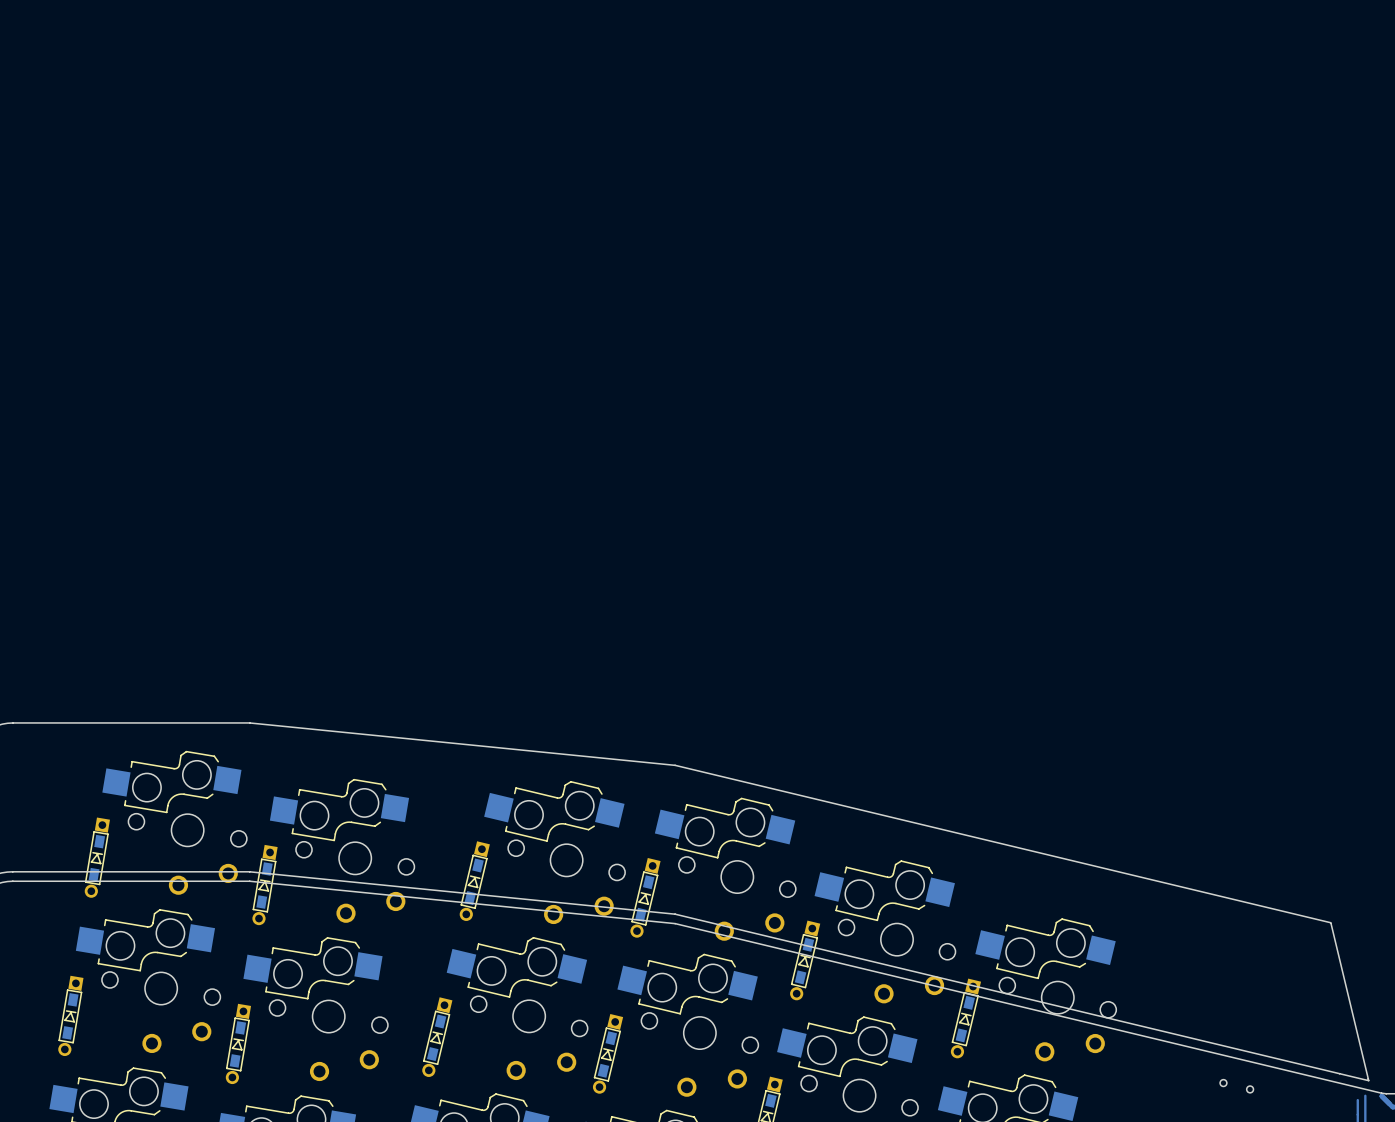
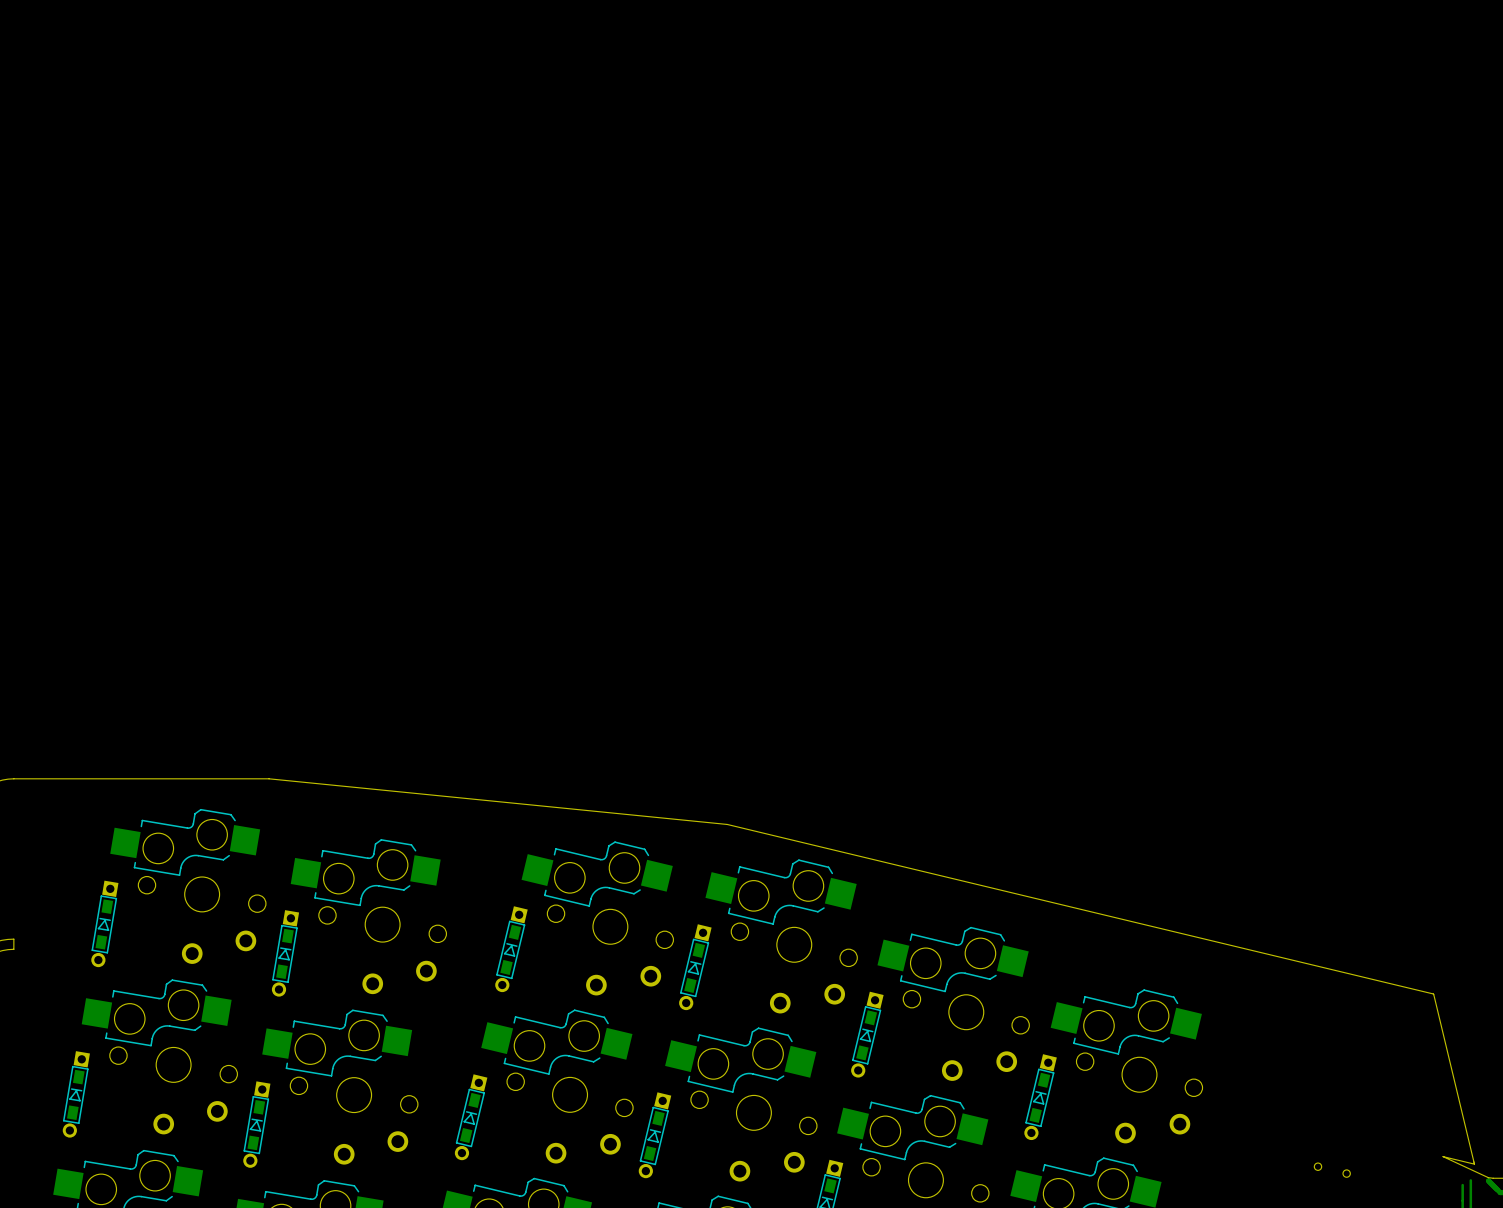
board edge: (12, 871) (249, 871) (675, 914) (1339, 1073) -> (13, 939) (13, 949)
board edge: (12, 881) (249, 881) (675, 923) (1381, 1093) -> (1443, 1156) (1488, 1177)

